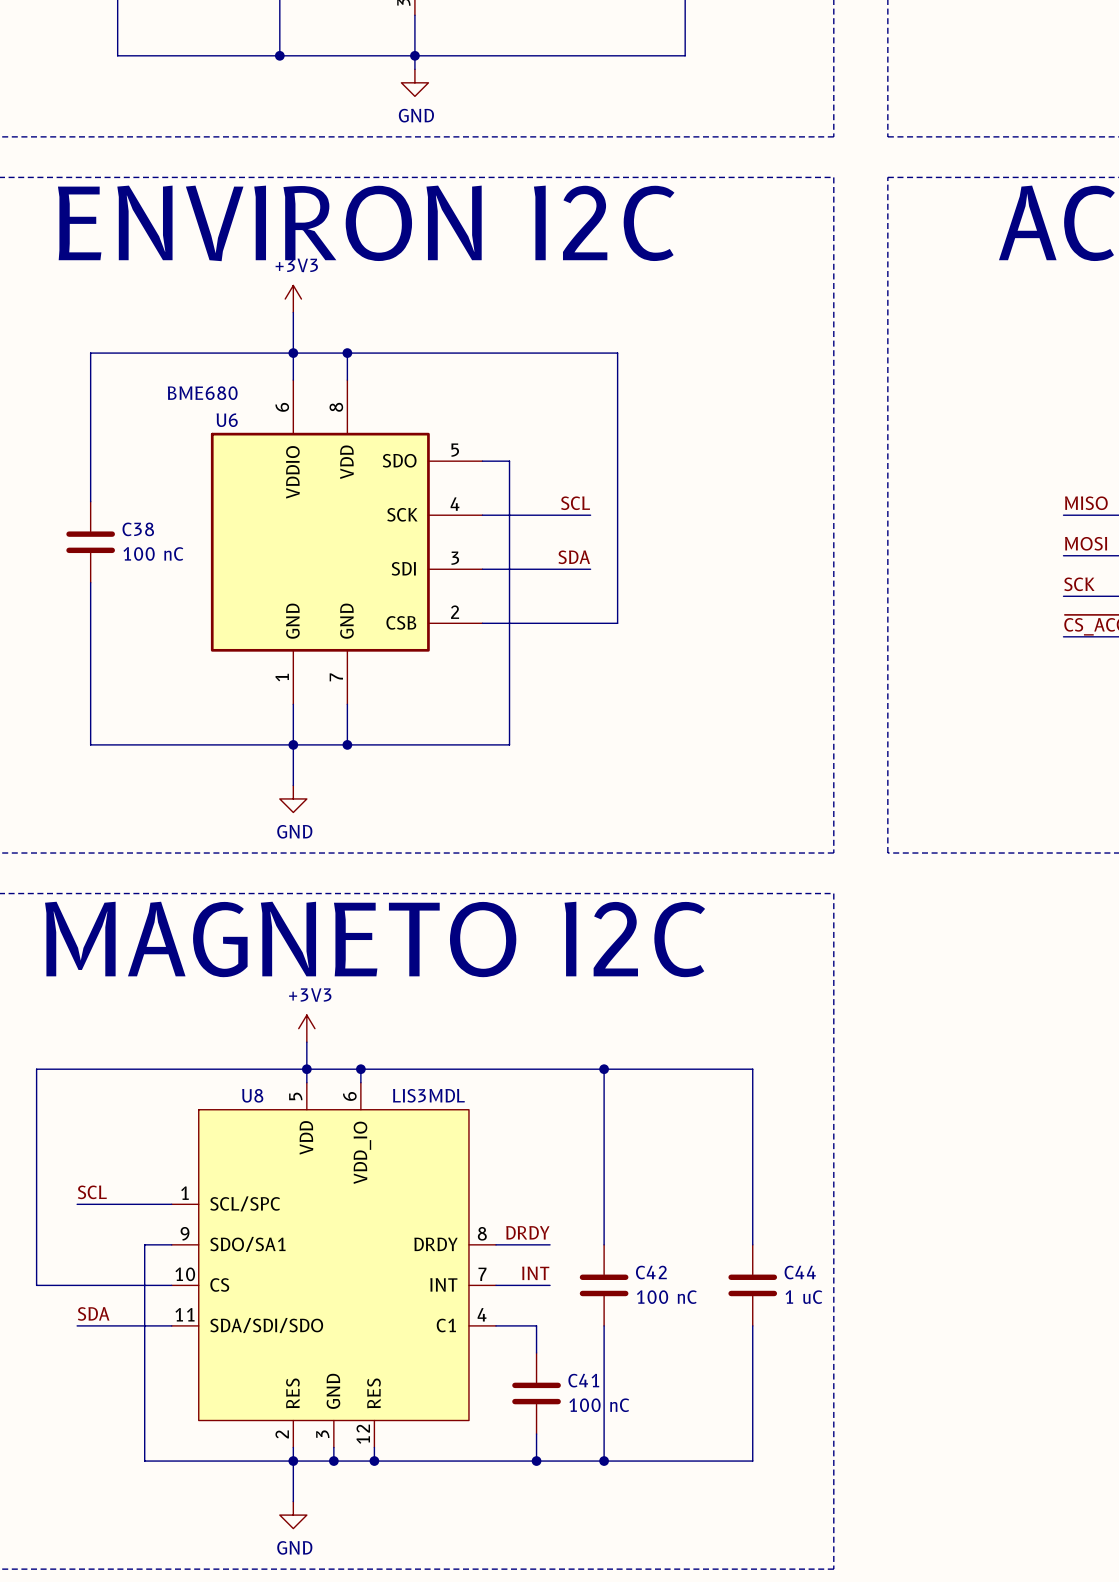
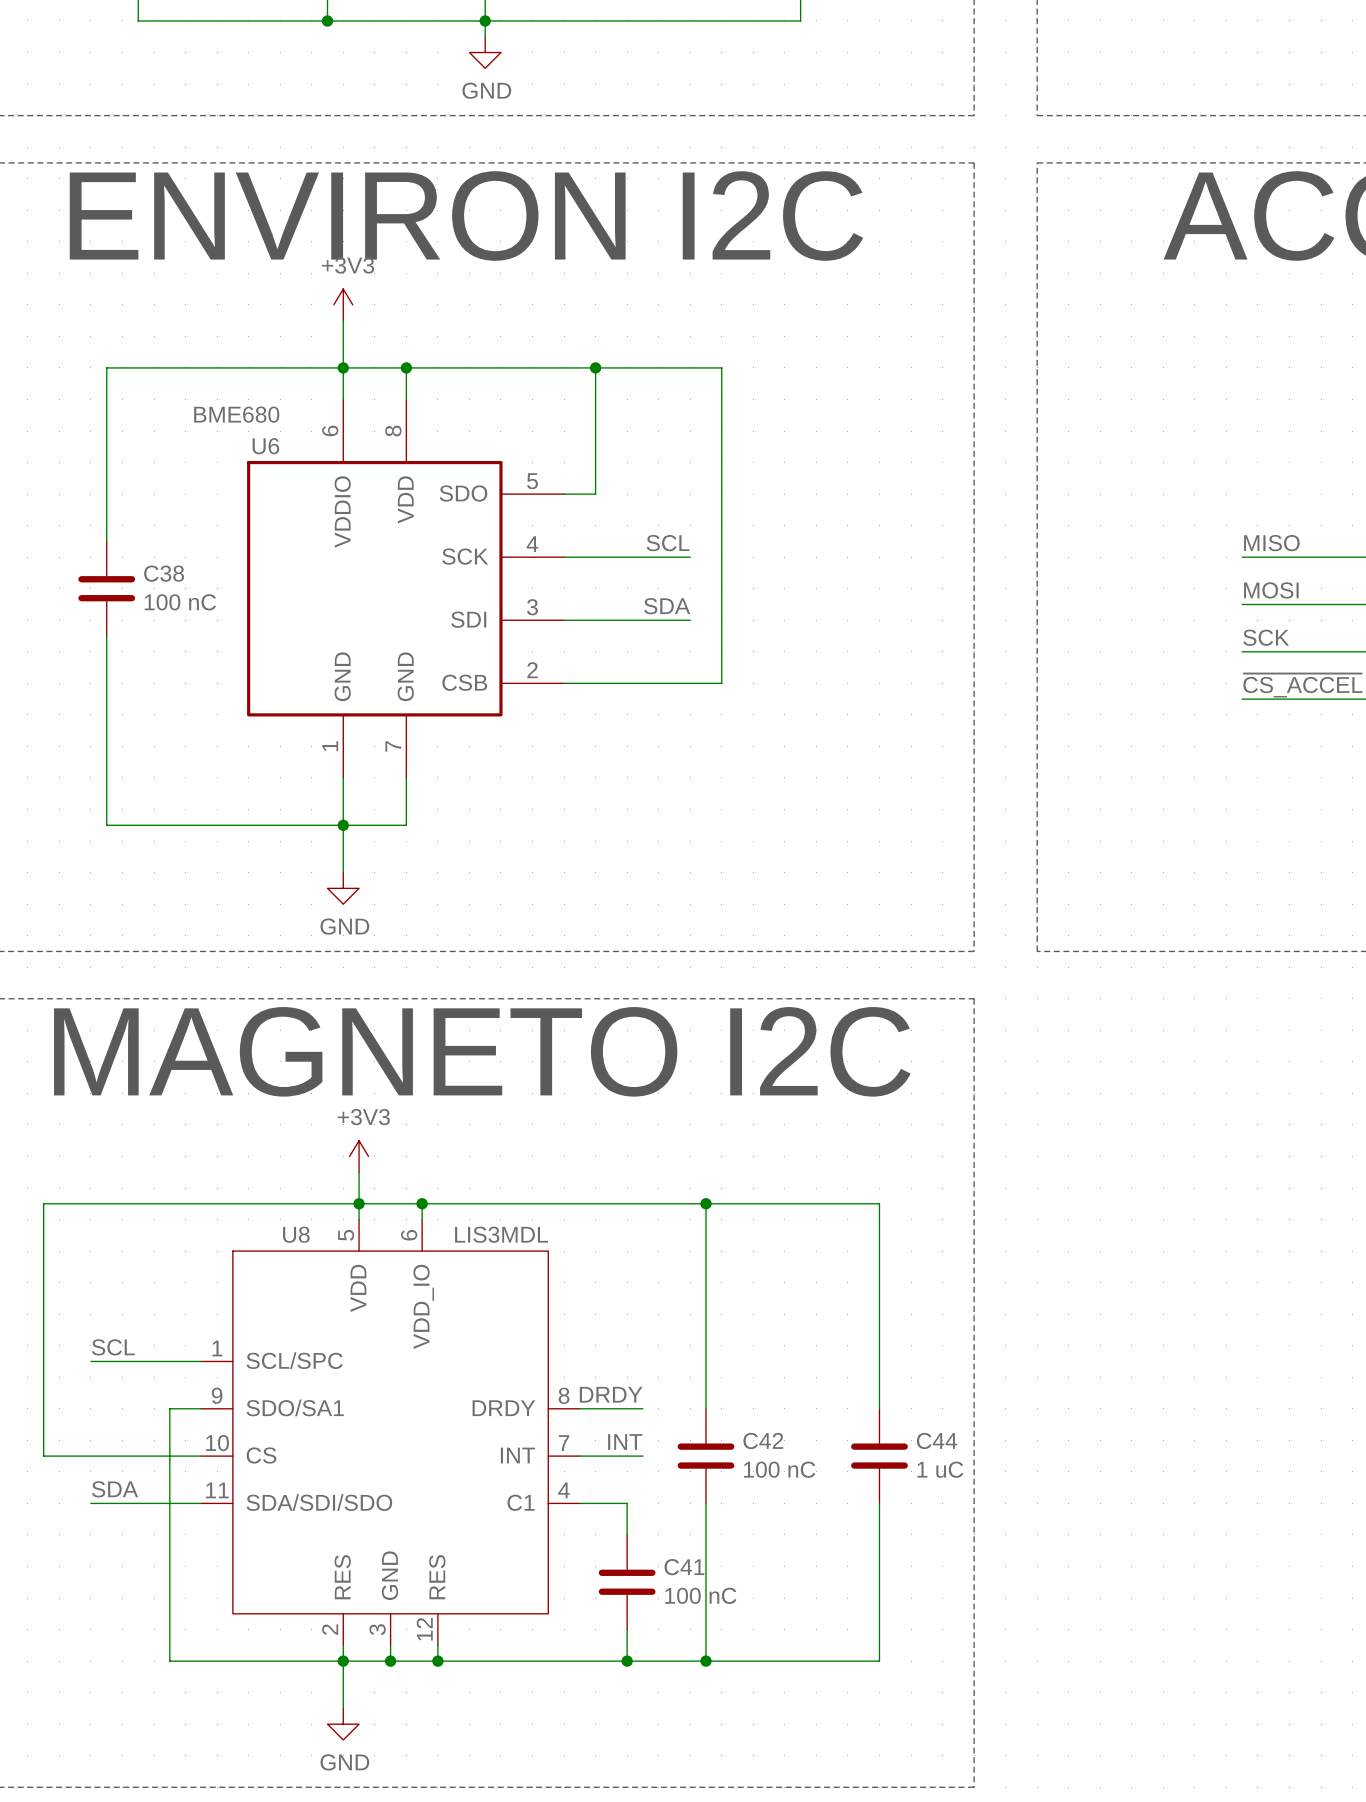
junction: none -> (595, 367)
wire: (509, 461) (509, 744) (347, 744) -> (595, 494) (595, 367)
junction: (347, 744) -> none

